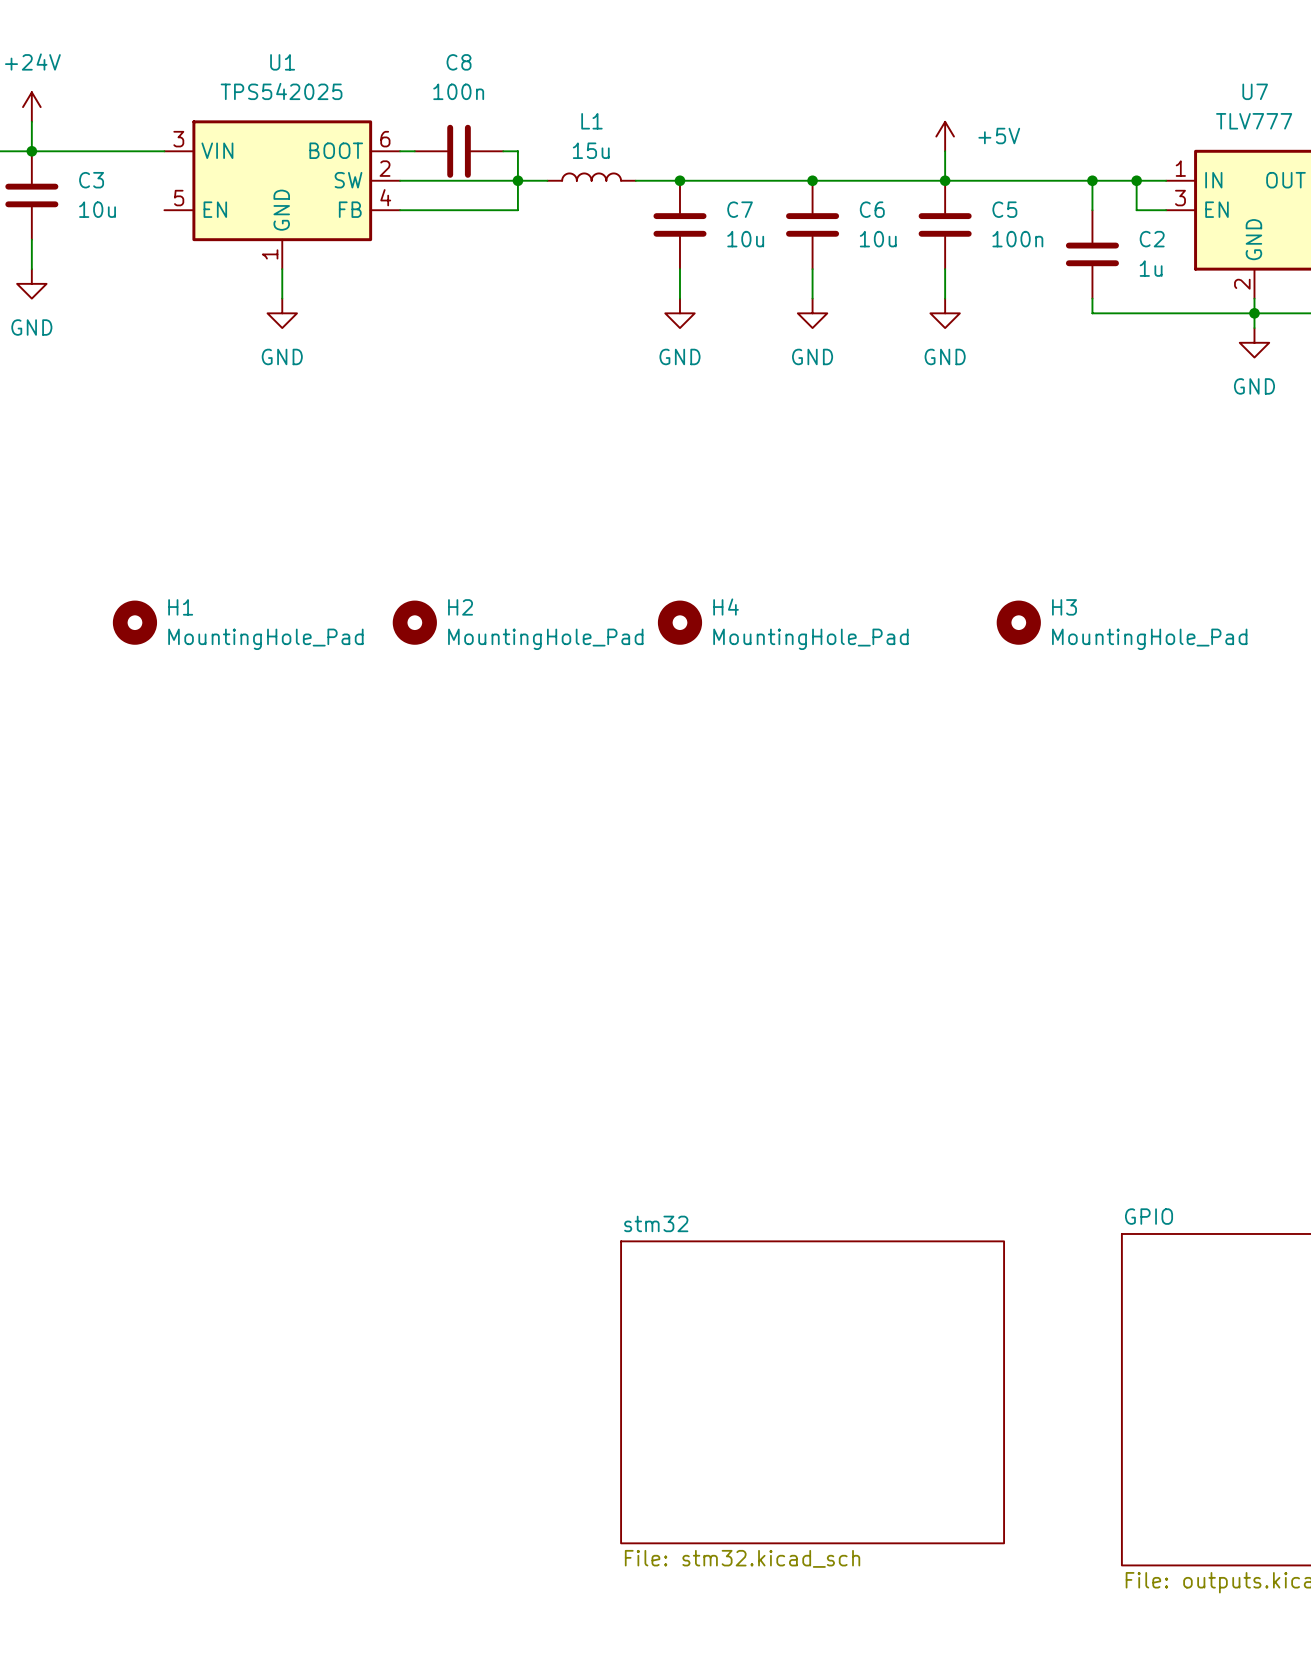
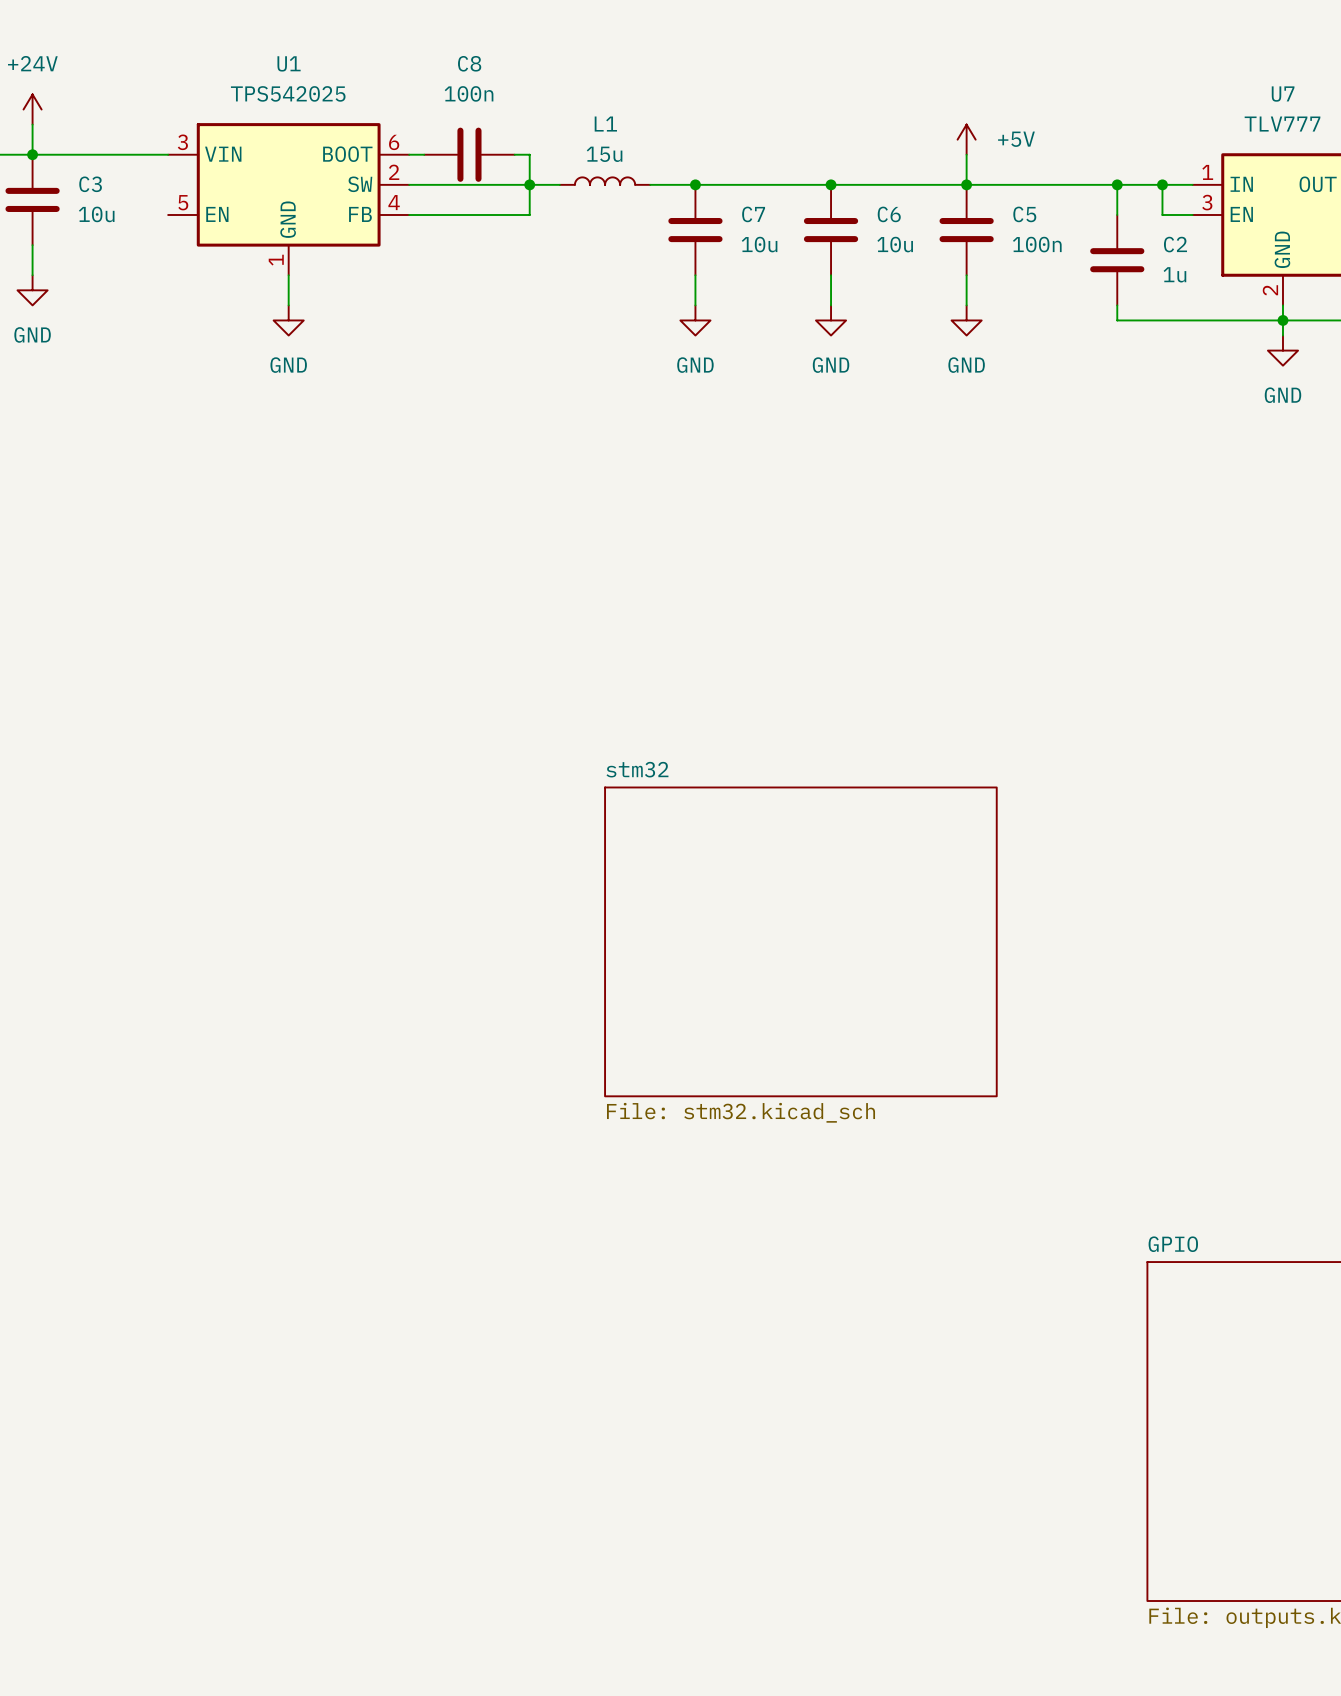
H1: MountingHole_Pad (134, 622) -> none
H2: MountingHole_Pad (414, 622) -> none
H4: MountingHole_Pad (679, 622) -> none
H3: MountingHole_Pad (1018, 622) -> none
sheet stm32 position: (812, 1392) -> (800, 941)

